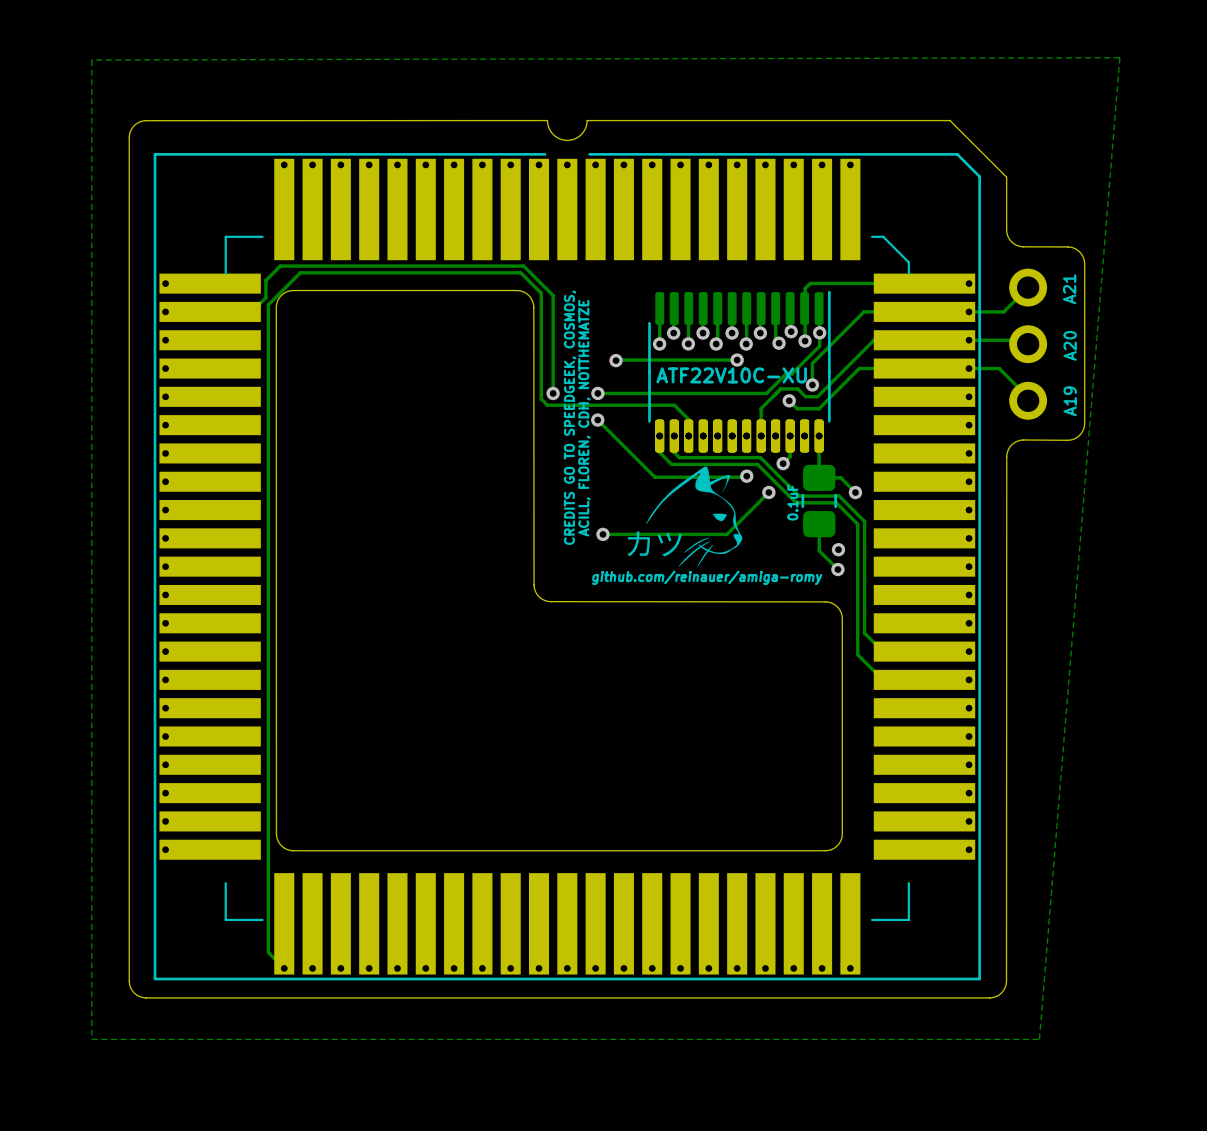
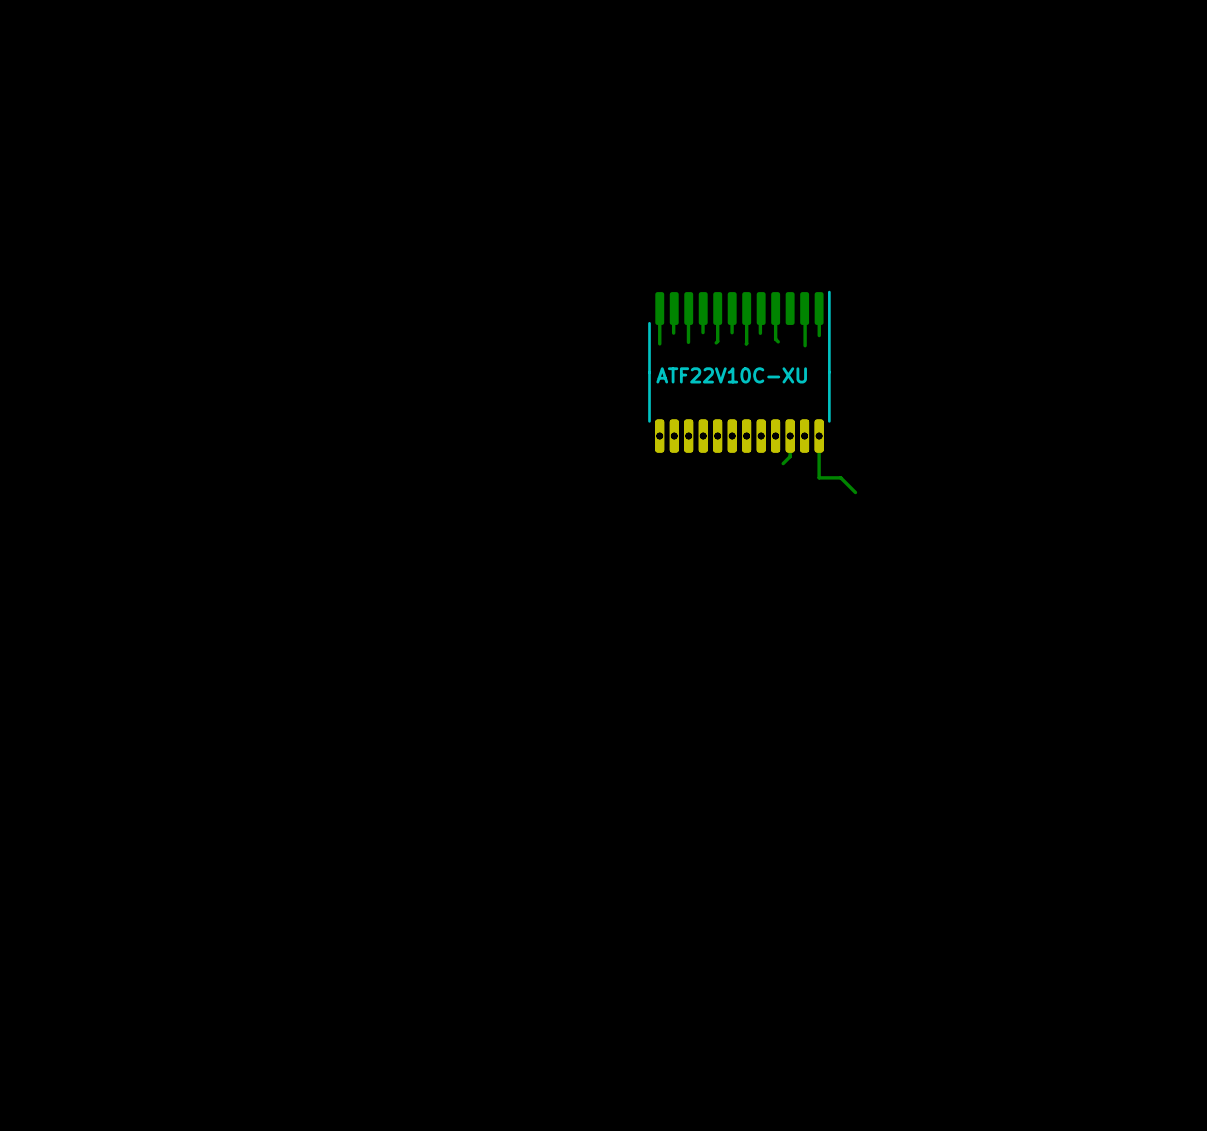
zone outline: (1119, 57) (1039, 1039) (91, 1039) (91, 60) (1119, 57) -> none
board edge: (950, 120) (1006, 177) (1006, 232) (1011, 241) (1021, 246) (1072, 247) (1081, 253) (1084, 263) (1083, 429) (1077, 436) (1069, 440) (1019, 440) (1011, 444) (1006, 454) (1006, 980) (1001, 992) (989, 997) (146, 997) (134, 992) (129, 980) (129, 137) (134, 125) (146, 120) (547, 120) (549, 128) (553, 134) (559, 138) (567, 140) (574, 138) (581, 134) (585, 128) (587, 120) (950, 120) -> none
track: (968, 283) (810, 283) (805, 288) (805, 304) -> none
track: (1028, 287) (1003, 311) (863, 311) (812, 363) (812, 384) -> none
board edge: (516, 290) (293, 290) (282, 294) (277, 301) (276, 833) (278, 842) (284, 848) (293, 850) (825, 850) (833, 848) (840, 842) (842, 833) (842, 618) (841, 612) (835, 605) (825, 601) (551, 601) (542, 599) (536, 593) (534, 584) (533, 307) (528, 295) (516, 290) -> none
track: (165, 311) (251, 311) (265, 297) (265, 280) (280, 266) (523, 266) (553, 295) (553, 393) -> none
via: (791, 331) -> none
track: (819, 332) (819, 346) (791, 374) (785, 374) (766, 393) (597, 393) -> none
via: (819, 332) -> none
via: (673, 333) -> none
via: (703, 333) -> none
via: (732, 333) -> none
via: (760, 333) -> none
via: (805, 341) -> none
via: (688, 343) -> none
via: (779, 343) -> none
via: (659, 344) -> none
via: (716, 344) -> none
via: (746, 344) -> none
track: (1028, 344) (1024, 340) (874, 340) (817, 396) (805, 396) (797, 388) (780, 388) (761, 408) (761, 435) -> none
part: (1028, 344) -> none
via: (616, 360) -> none
track: (737, 360) (616, 360) -> none
via: (737, 360) -> none
via: (812, 384) -> none
via: (553, 393) -> none
via: (597, 393) -> none
via: (789, 400) -> none
track: (1028, 400) (1028, 397) (999, 368) (859, 368) (819, 408) (797, 408) (789, 400) -> none
text: CREDITS GO TO SPEEDGEEK, COSMOS, (570, 417) -> none
text: ACILL, FLOREN, CDH, NOTTHEMATZE (584, 418) -> none
track: (597, 420) (654, 477) (746, 476) -> none
via: (597, 420) -> none
track: (688, 435) (688, 419) (674, 405) (547, 405) (541, 399) (541, 293) (520, 272) (300, 272) (268, 304) (268, 952) (284, 968) -> none
track: (659, 436) (659, 452) (671, 464) (757, 464) (796, 502) (836, 502) (857, 524) (857, 654) (882, 679) (969, 679) -> none
track: (674, 436) (674, 452) (679, 457) (760, 457) (798, 496) (839, 496) (864, 521) (864, 633) (882, 651) (969, 651) -> none
via: (783, 463) -> none
via: (746, 476) -> none
track: (768, 492) (726, 534) (602, 534) -> none
via: (768, 492) -> none
via: (855, 492) -> none
part: 0.1uF (819, 501) -> none
カツ: (694, 516) -> none
track: (819, 524) (819, 550) (837, 569) -> none
via: (602, 534) -> none
via: (838, 549) -> none
part: (567, 566) -> none
via: (837, 569) -> none
text: github.com/reinauer/amiga-romy (707, 577) -> none

